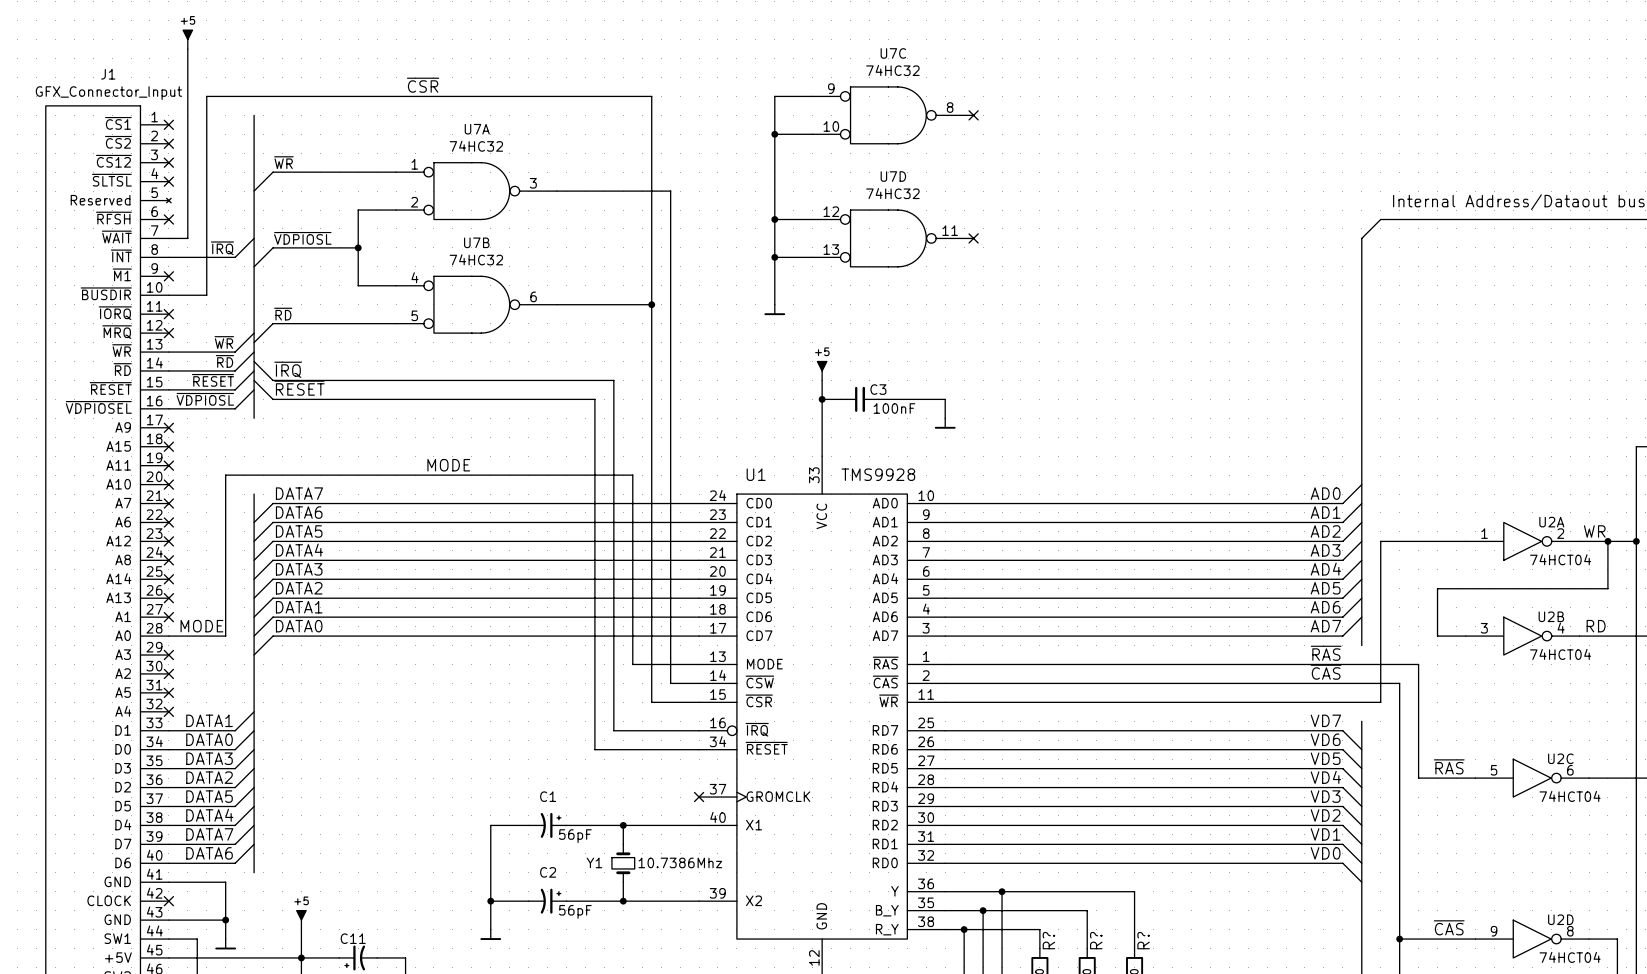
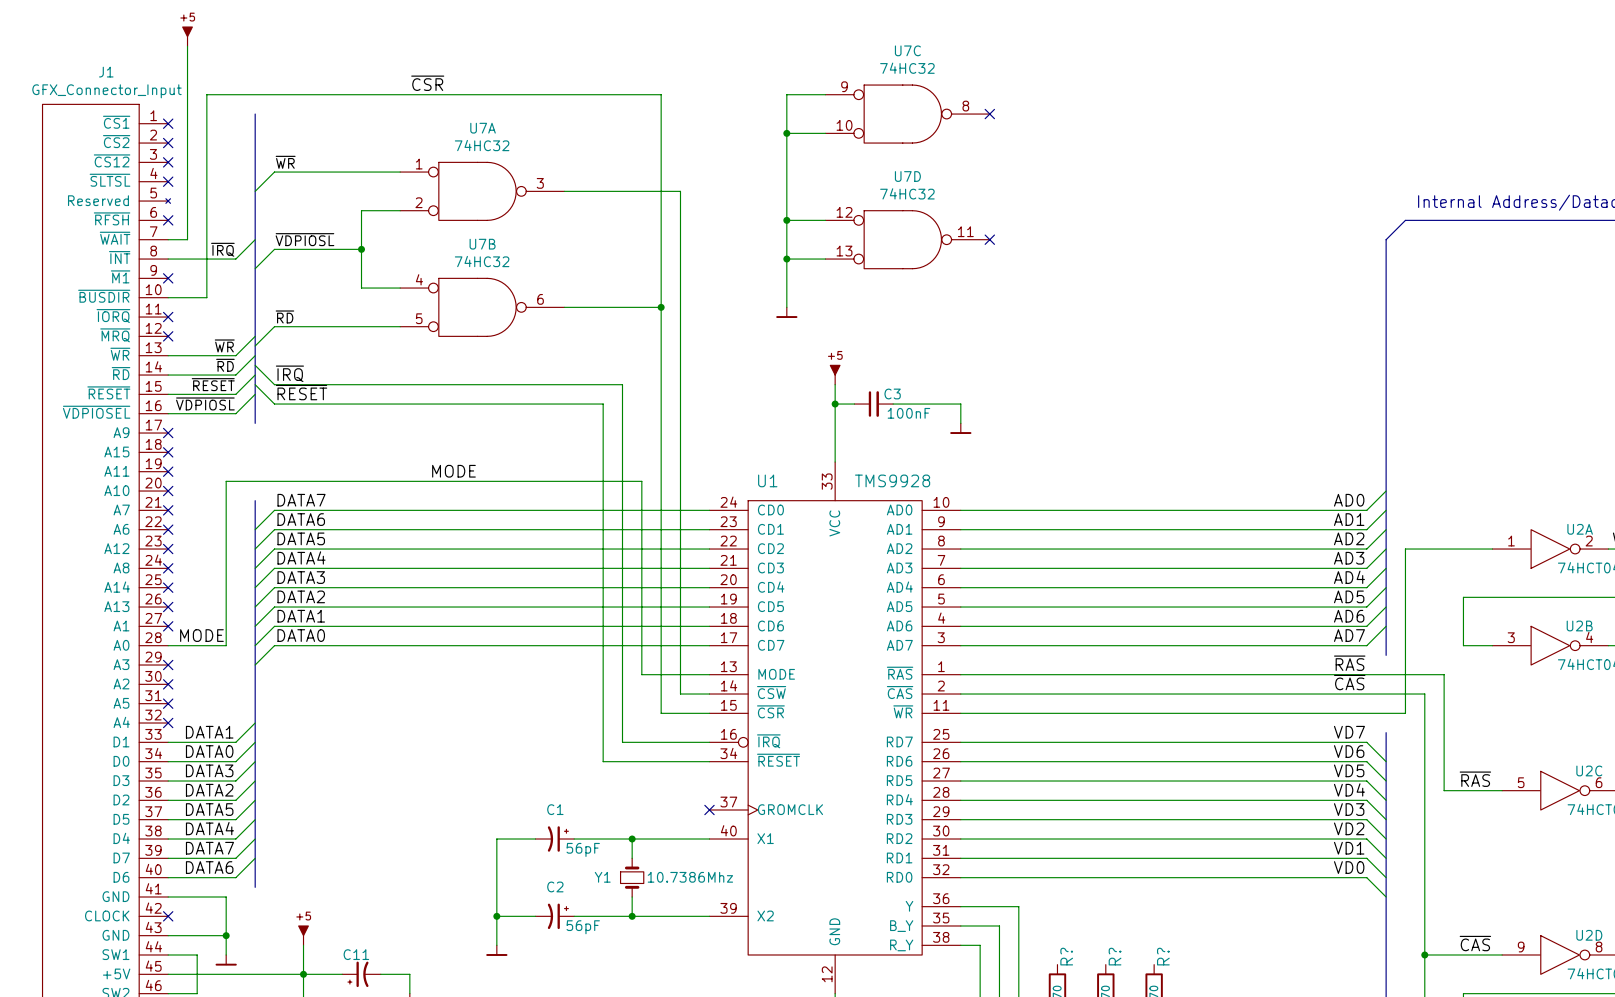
wire: (1002, 891) (1134, 891) (1134, 948) -> none
junction: (1002, 891) -> none
wire: (983, 910) (1087, 910) (1087, 948) -> none
junction: (983, 910) -> none
wire: (964, 929) (1039, 929) (1039, 948) -> none
junction: (964, 929) -> none

